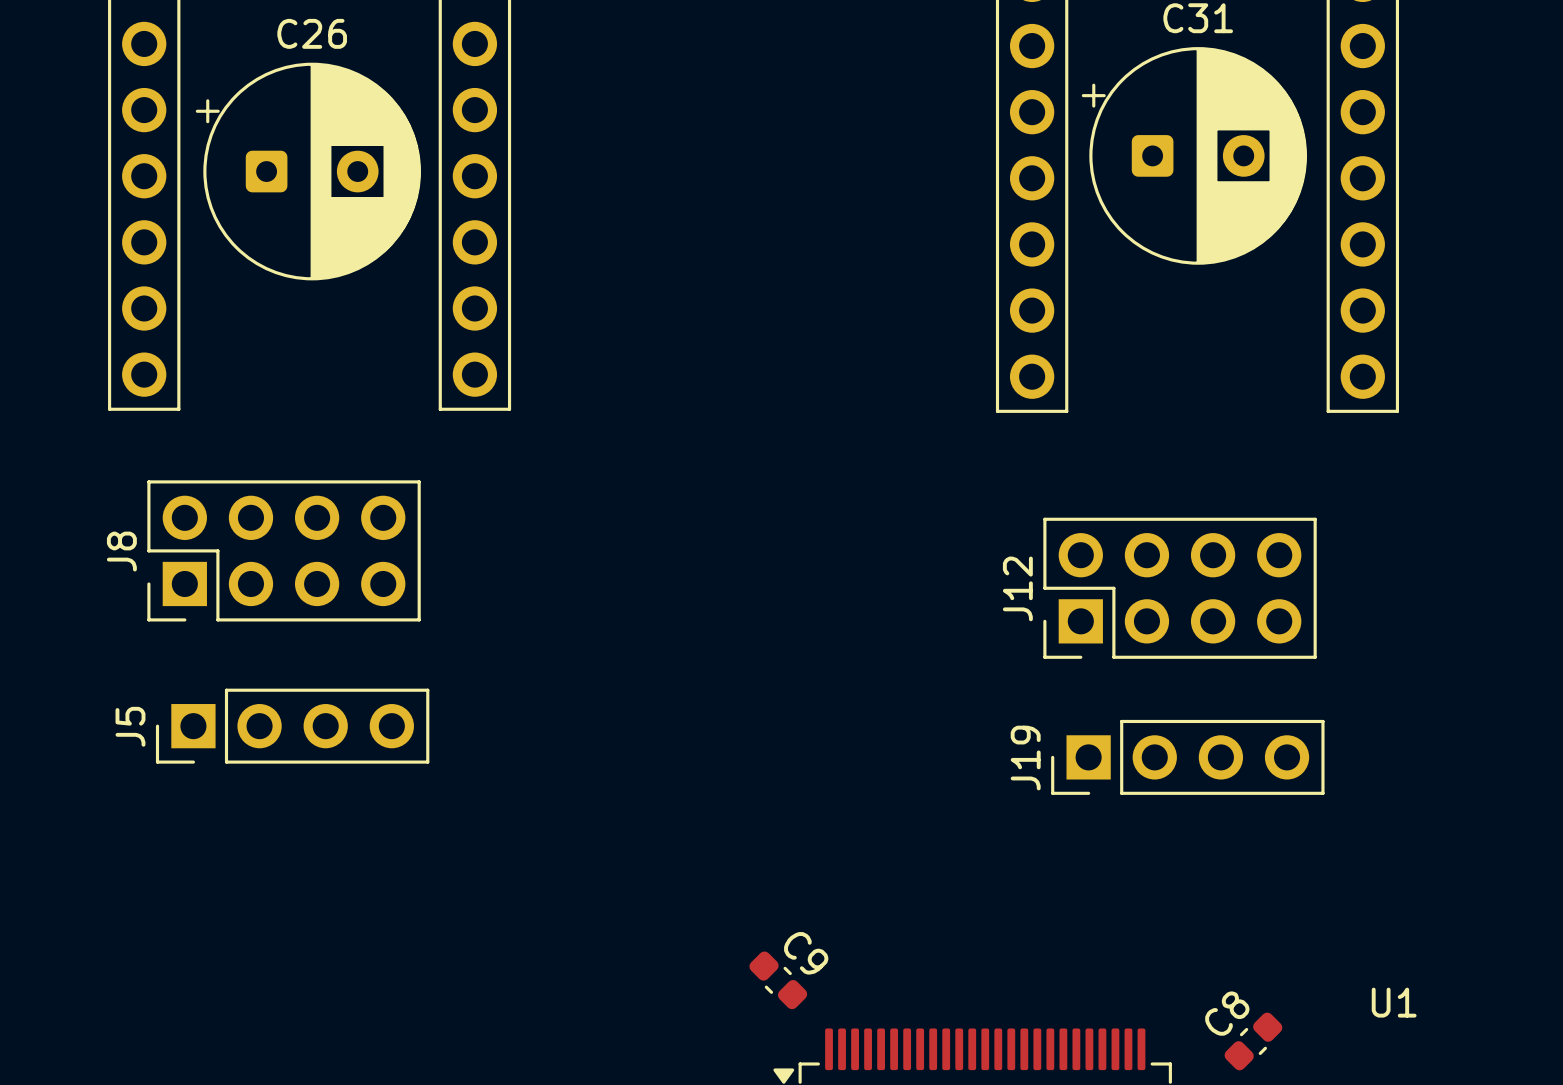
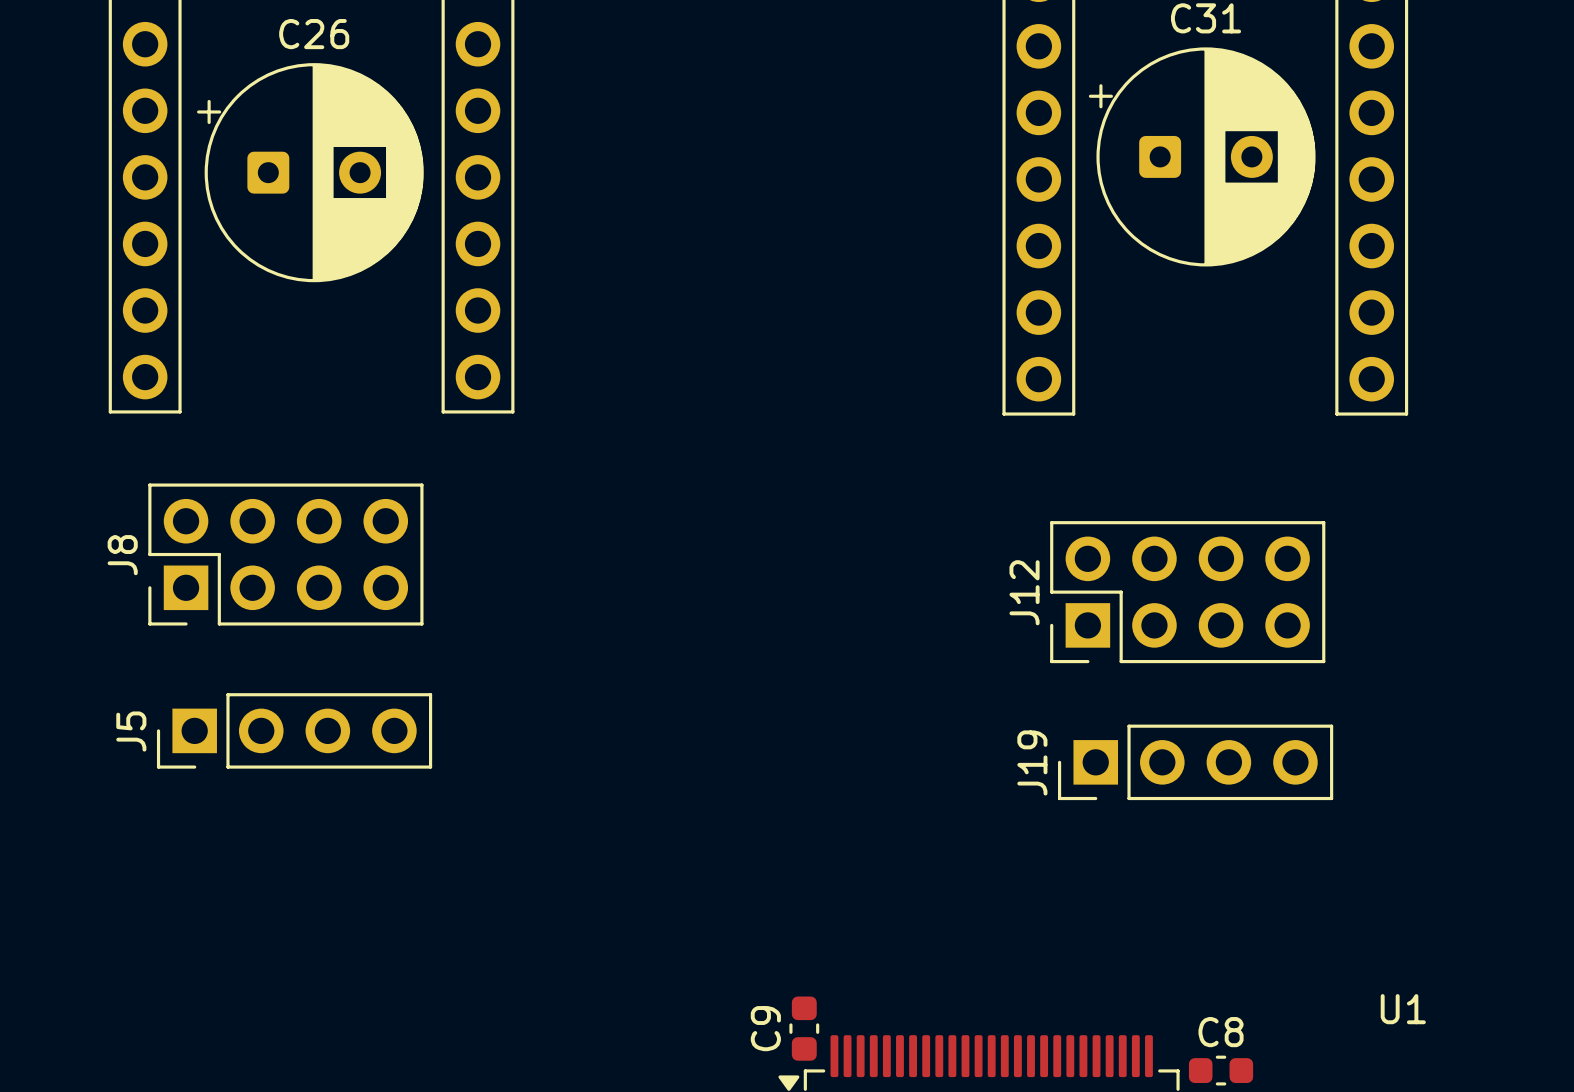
C9 name position: C9 (806, 953) -> C9 (765, 1028)
C9 rotation: 0° (778, 980) -> 45° clockwise (804, 1028)
C9 position: (778, 980) -> (804, 1028)
C8 rotation: 0° (1253, 1041) -> 45° clockwise (1221, 1070)
C8 position: (1253, 1041) -> (1221, 1070)

